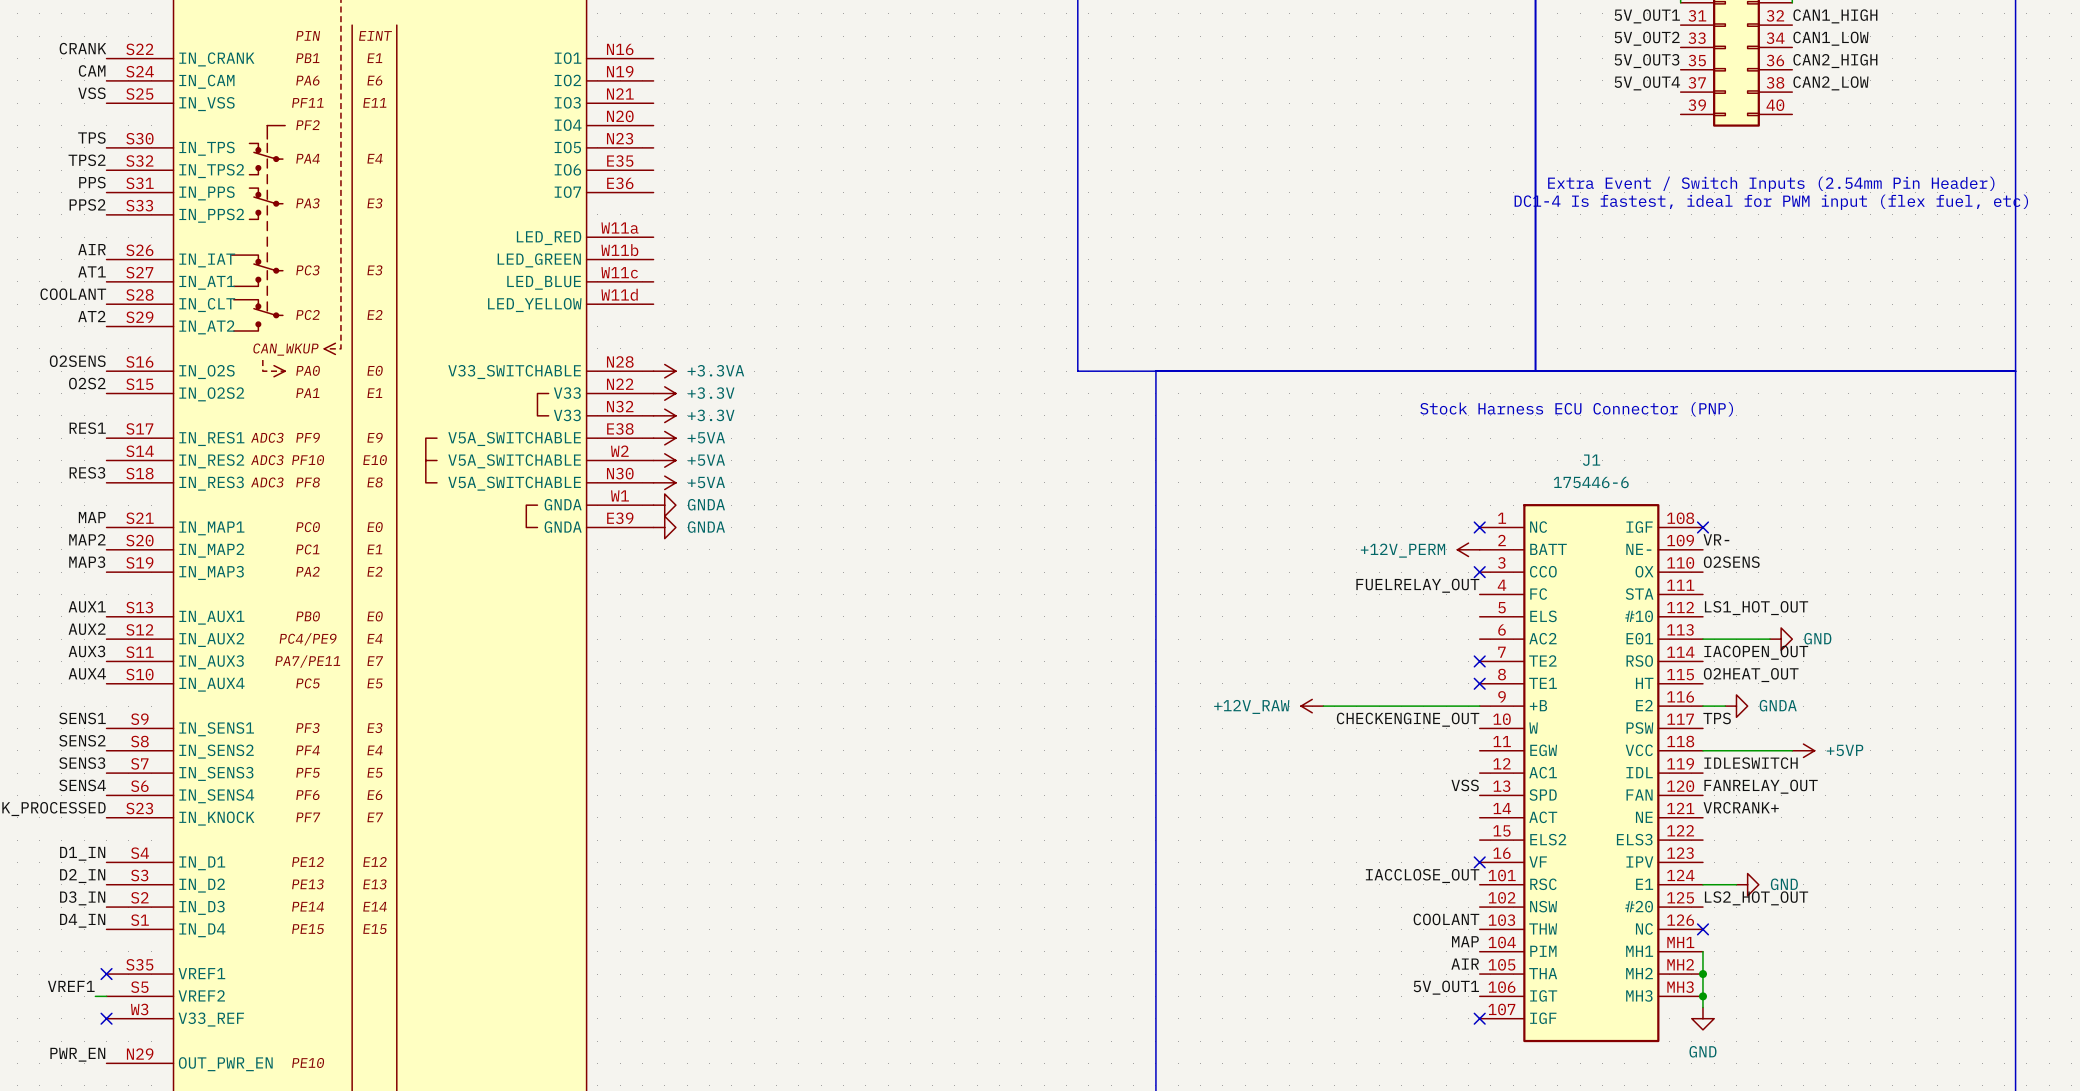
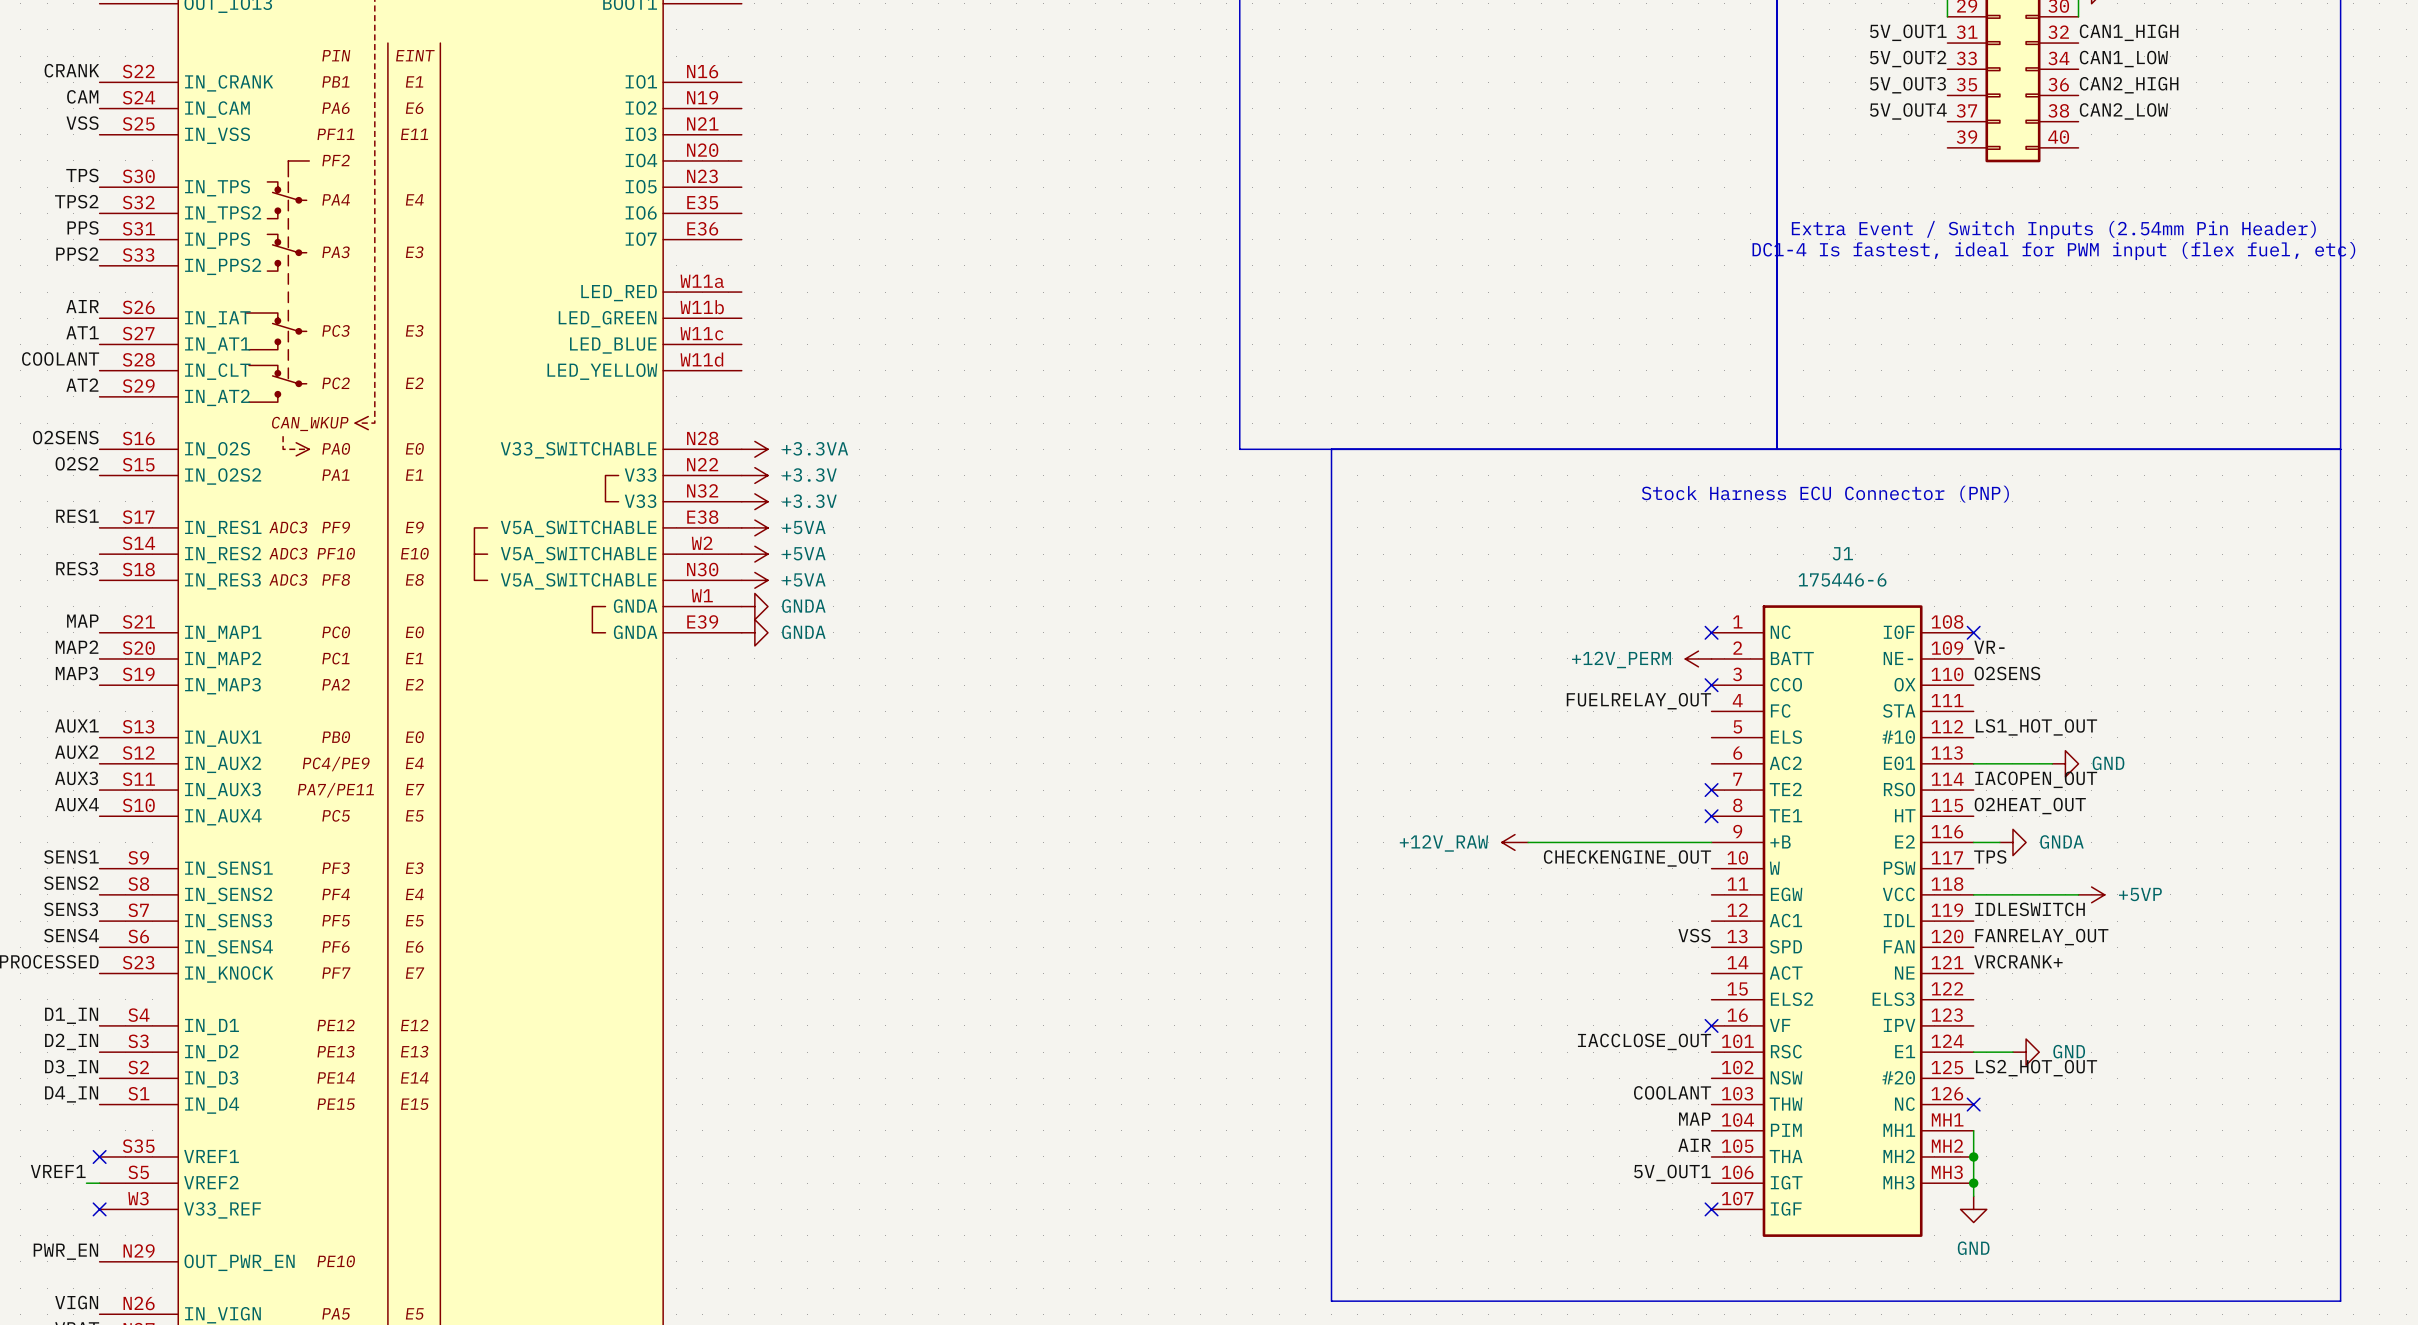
J1 pin name: IGF (1639, 527) -> I0F (1899, 632)

